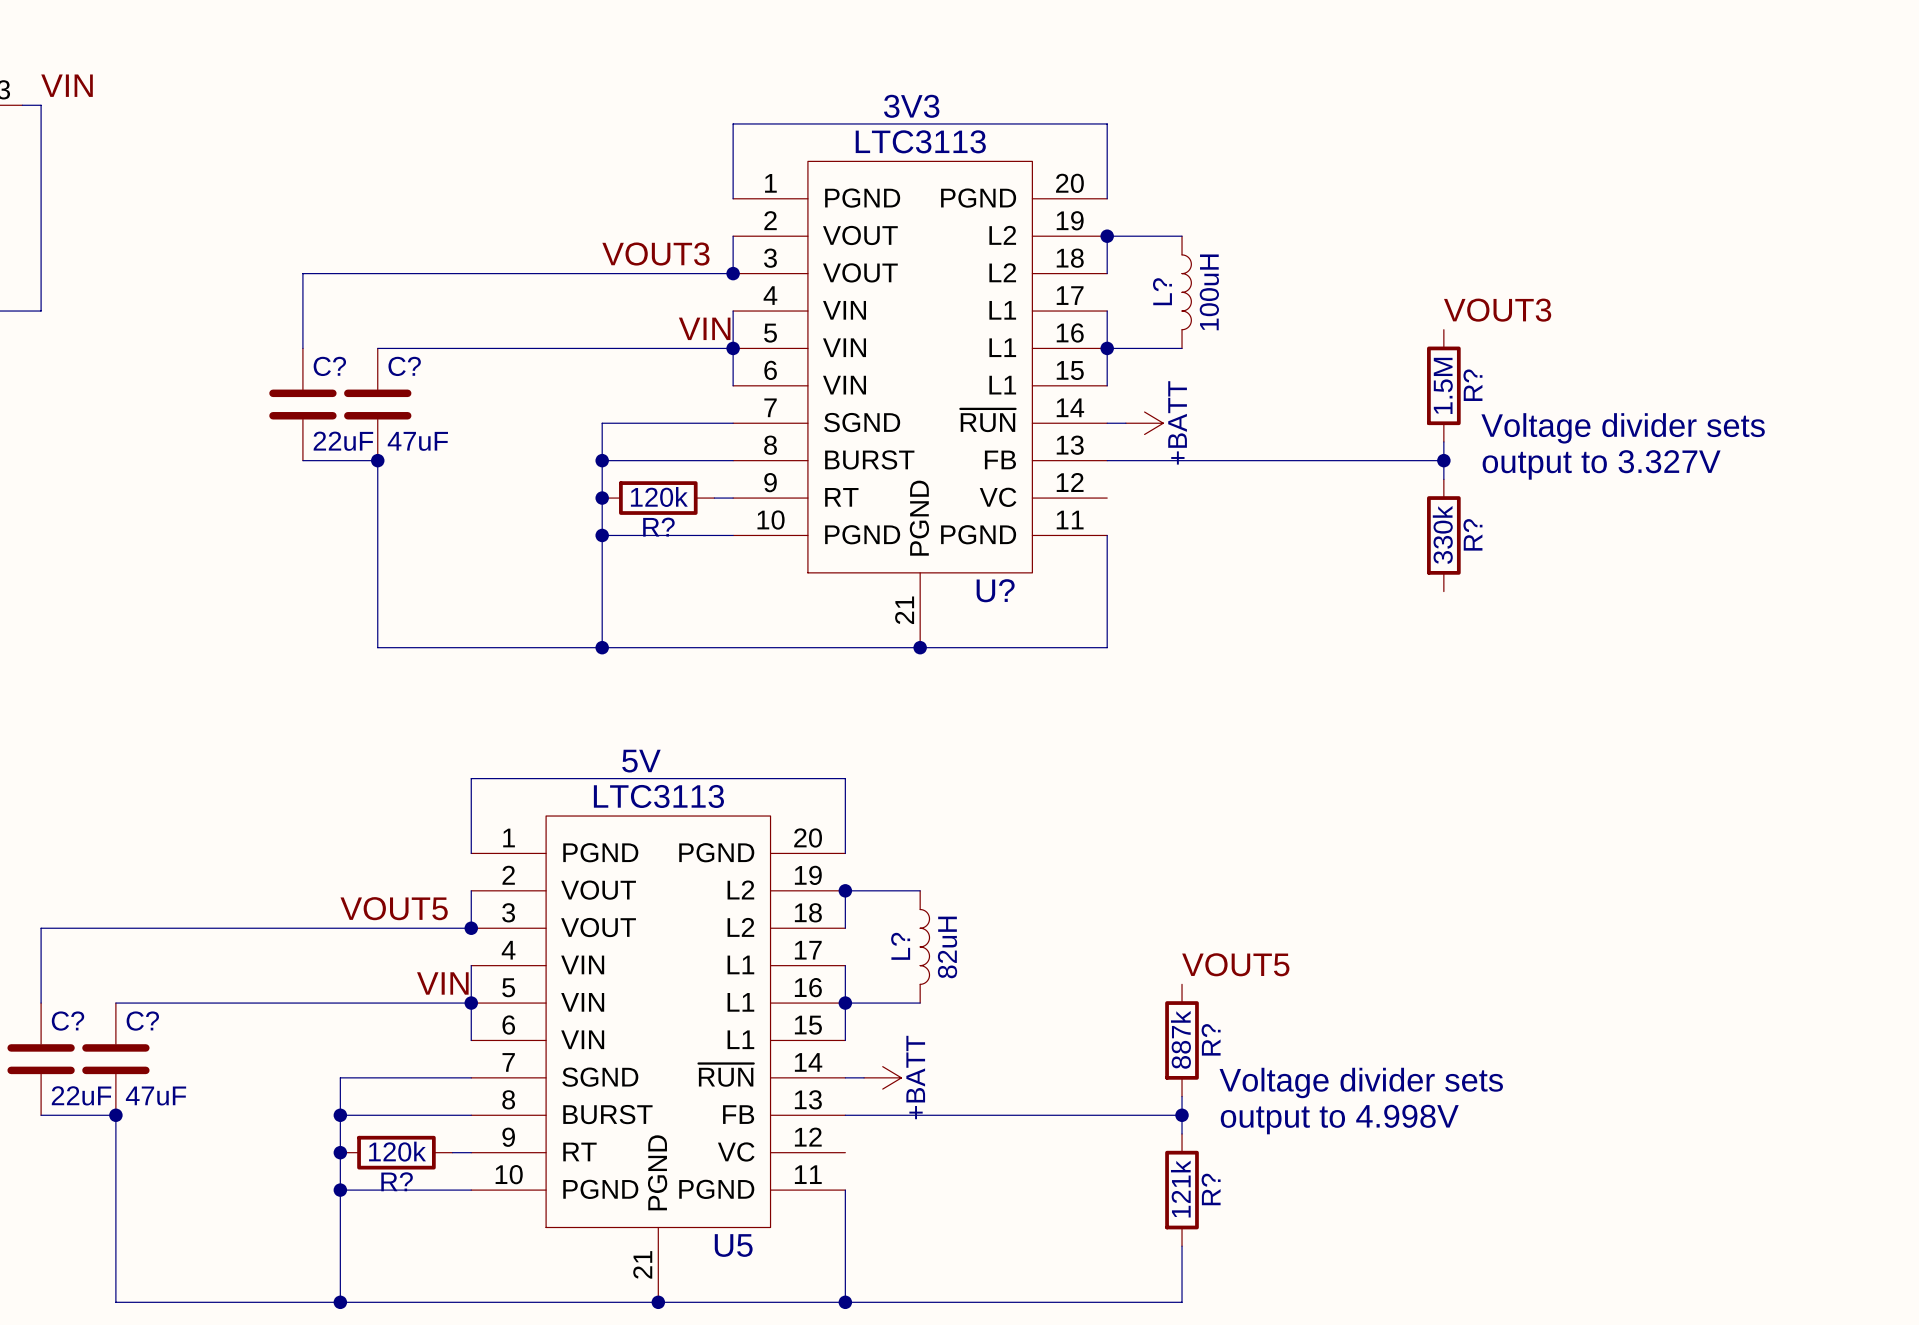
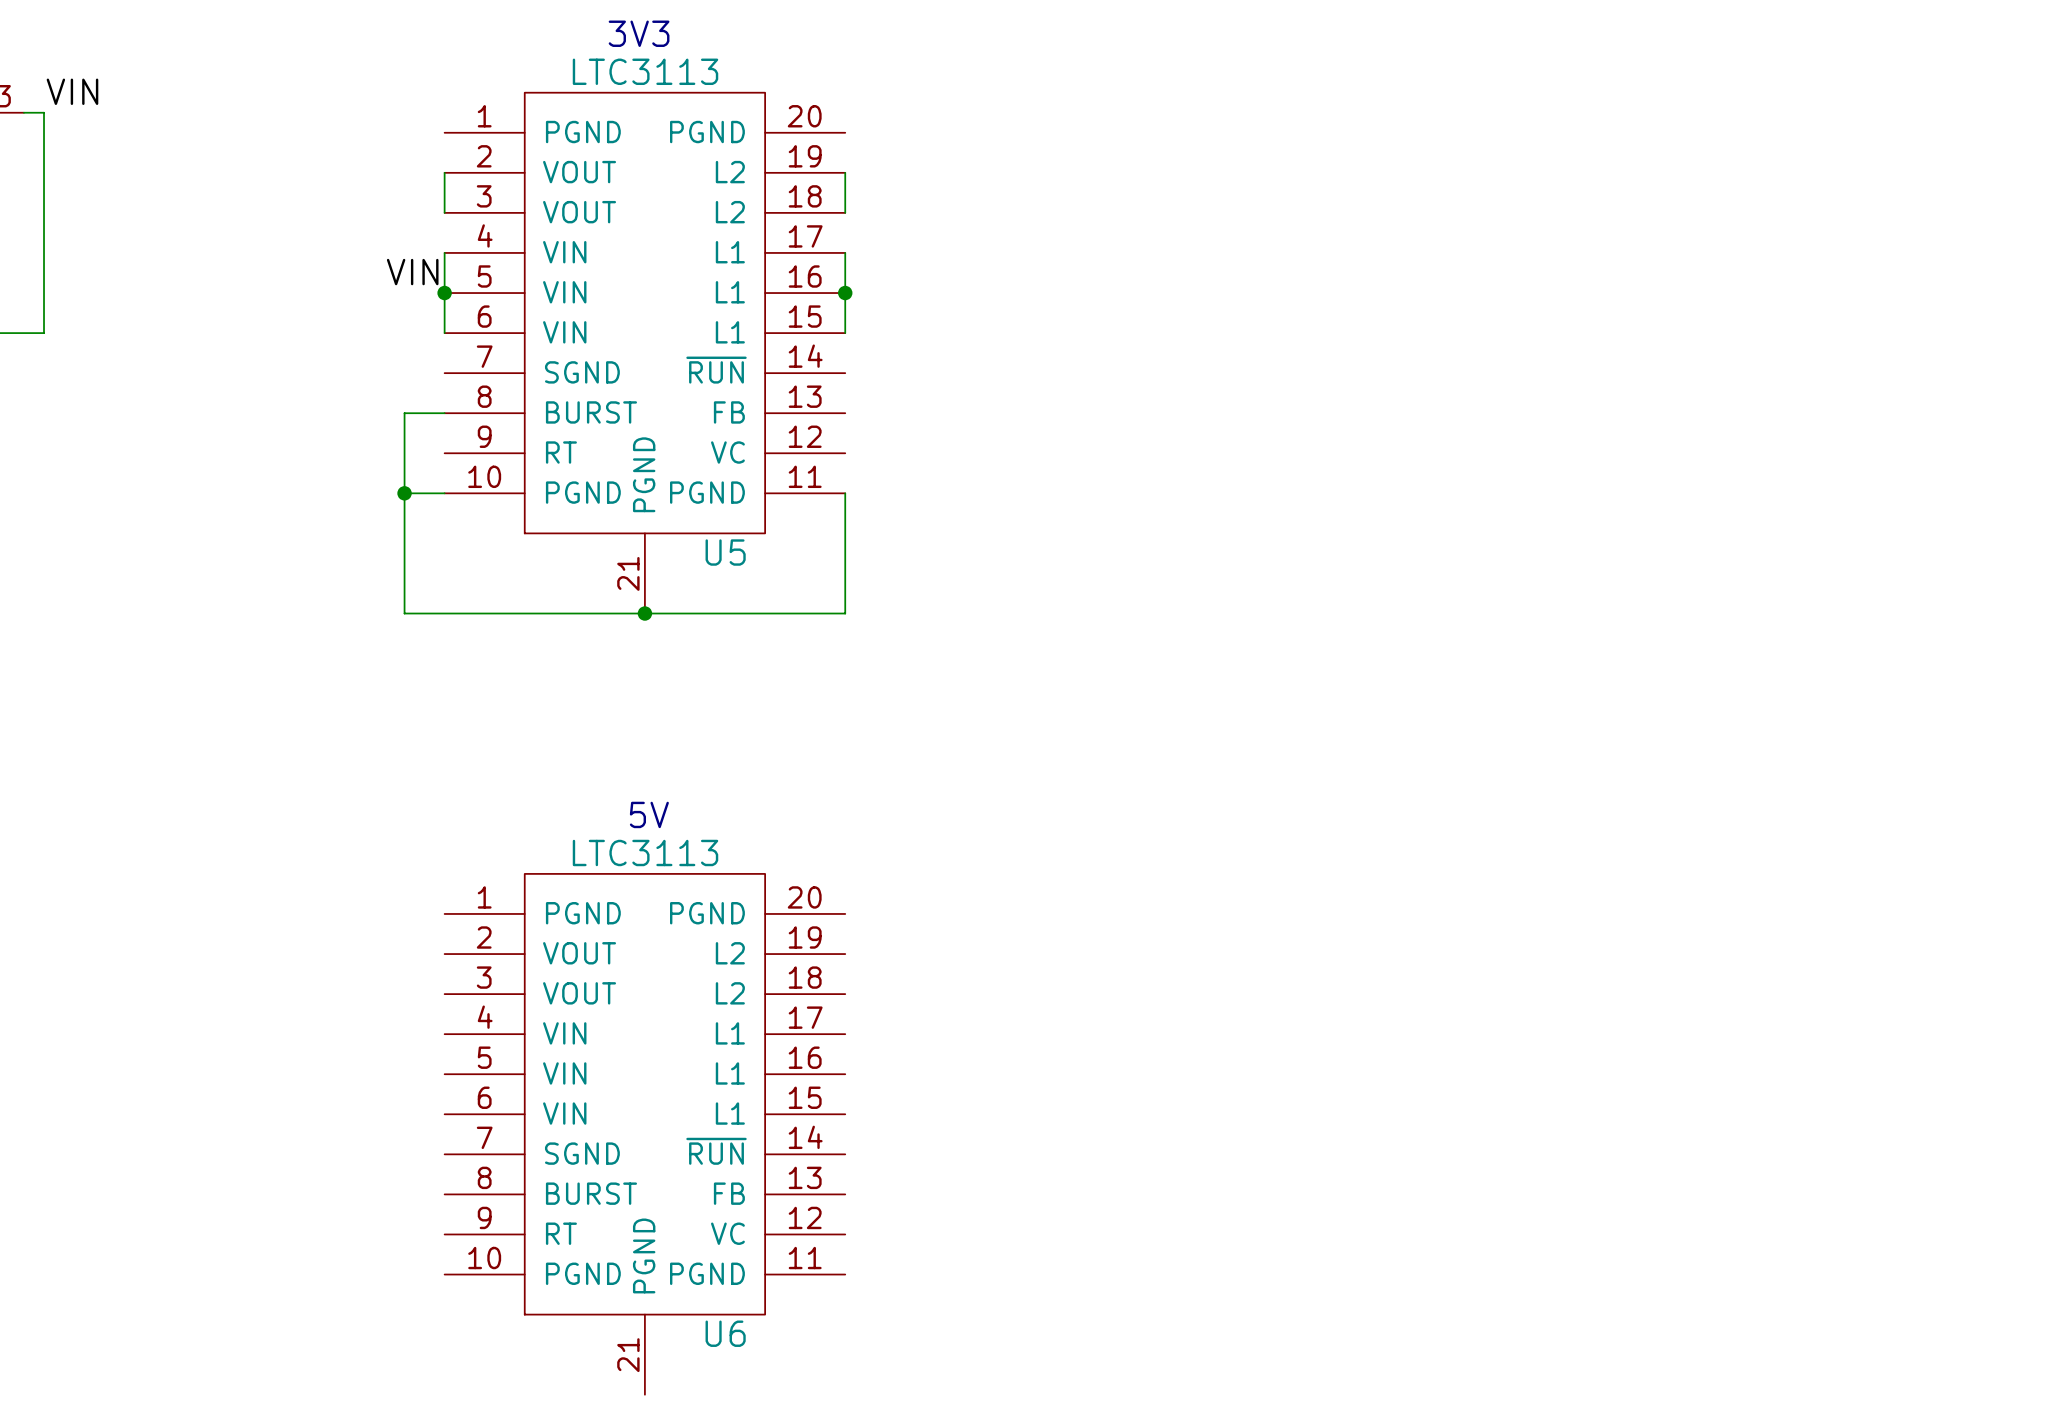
text position: 3V3 (911, 106) -> 3V3 (639, 33)
wire: none -> (444, 172) (444, 212)
wire: none -> (845, 172) (845, 212)
wire: (733, 198) (733, 123) (1107, 123) (1107, 198) -> none
wire: (733, 236) (733, 273) (302, 273) (302, 348) -> none
junction: (1107, 236) -> none
wire: (1182, 236) (1107, 236) (1107, 273) -> none
label: VOUT3 (655, 254) -> none
junction: none -> (444, 293)
junction: (733, 273) -> none
junction: none -> (845, 293)
L?: 100uH (1186, 292) -> none
label: VOUT3 (1497, 310) -> none
wire: (733, 311) (733, 385) -> (444, 252) (444, 333)
wire: (1107, 311) (1107, 385) -> (845, 252) (845, 333)
label position: VIN (704, 328) -> VIN (412, 272)
wire: (377, 348) (733, 348) -> none
junction: (733, 348) -> none
wire: (1107, 348) (1182, 348) -> none
junction: (1107, 348) -> none
wire: none -> (444, 413) (404, 413) (404, 493) (444, 493)
R?: 1.5M (1443, 385) -> none
C?: 22uF (302, 404) -> none
C?: 47uF (377, 404) -> none
U?: LTC3113 (920, 404) -> none
wire: (733, 423) (602, 423) (602, 647) -> none
wire: (1107, 423) (1125, 423) -> none
power symbol: +BATT (1144, 423) -> none
text: Voltage divider sets (1623, 428) -> none
wire: (1443, 441) (1443, 479) -> none
wire: (302, 460) (377, 460) -> none
wire: (602, 460) (733, 460) -> none
junction: (602, 460) -> none
wire: (1107, 460) (1443, 460) -> none
junction: (1443, 460) -> none
text: output to 3.327V (1601, 464) -> none
junction: (602, 498) -> none
R?: 120k (658, 498) -> none
wire: (714, 498) (733, 498) -> none
wire: (602, 535) (733, 535) -> none
junction: (602, 535) -> none
wire: (1107, 535) (1107, 647) (377, 647) (377, 572) -> (845, 493) (845, 613) (404, 613)
R?: 330k (1443, 535) -> none
junction: none -> (644, 613)
junction: (602, 647) -> none
junction: (920, 647) -> none
text position: 5V (641, 761) -> 5V (649, 814)
wire: (471, 853) (471, 778) (845, 778) (845, 853) -> none
wire: (471, 890) (471, 928) (41, 928) (41, 1003) -> none
junction: (845, 890) -> none
wire: (920, 890) (845, 890) (845, 928) -> none
label: VOUT5 (394, 908) -> none
junction: (471, 928) -> none
L?: 82uH (924, 946) -> none
label: VOUT5 (1235, 964) -> none
wire: (471, 965) (471, 1040) -> none
wire: (845, 965) (845, 1040) -> none
label: VIN (442, 983) -> none
wire: (115, 1003) (471, 1003) -> none
junction: (471, 1003) -> none
wire: (845, 1003) (920, 1003) -> none
junction: (845, 1003) -> none
R?: 887k (1182, 1040) -> none
C?: 22uF (41, 1059) -> none
C?: 47uF (115, 1059) -> none
U6: none -> LTC3113 (644, 1134)
U5 position: (658, 1059) -> (644, 353)
wire: (471, 1077) (340, 1077) (340, 1302) -> none
wire: (845, 1077) (864, 1077) -> none
power symbol: +BATT (882, 1077) -> none
text: Voltage divider sets (1361, 1082) -> none
wire: (1182, 1096) (1182, 1133) -> none
wire: (41, 1115) (115, 1115) (115, 1302) (1182, 1302) (1182, 1246) -> none
junction: (115, 1115) -> none
wire: (340, 1115) (471, 1115) -> none
junction: (340, 1115) -> none
wire: (845, 1115) (1182, 1115) -> none
junction: (1182, 1115) -> none
text: output to 4.998V (1339, 1119) -> none
junction: (340, 1152) -> none
R?: 120k (396, 1152) -> none
wire: (340, 1190) (471, 1190) -> none
junction: (340, 1190) -> none
wire: (845, 1190) (845, 1302) -> none
R?: 121k (1182, 1190) -> none
junction: (340, 1302) -> none
junction: (658, 1302) -> none
junction: (845, 1302) -> none

